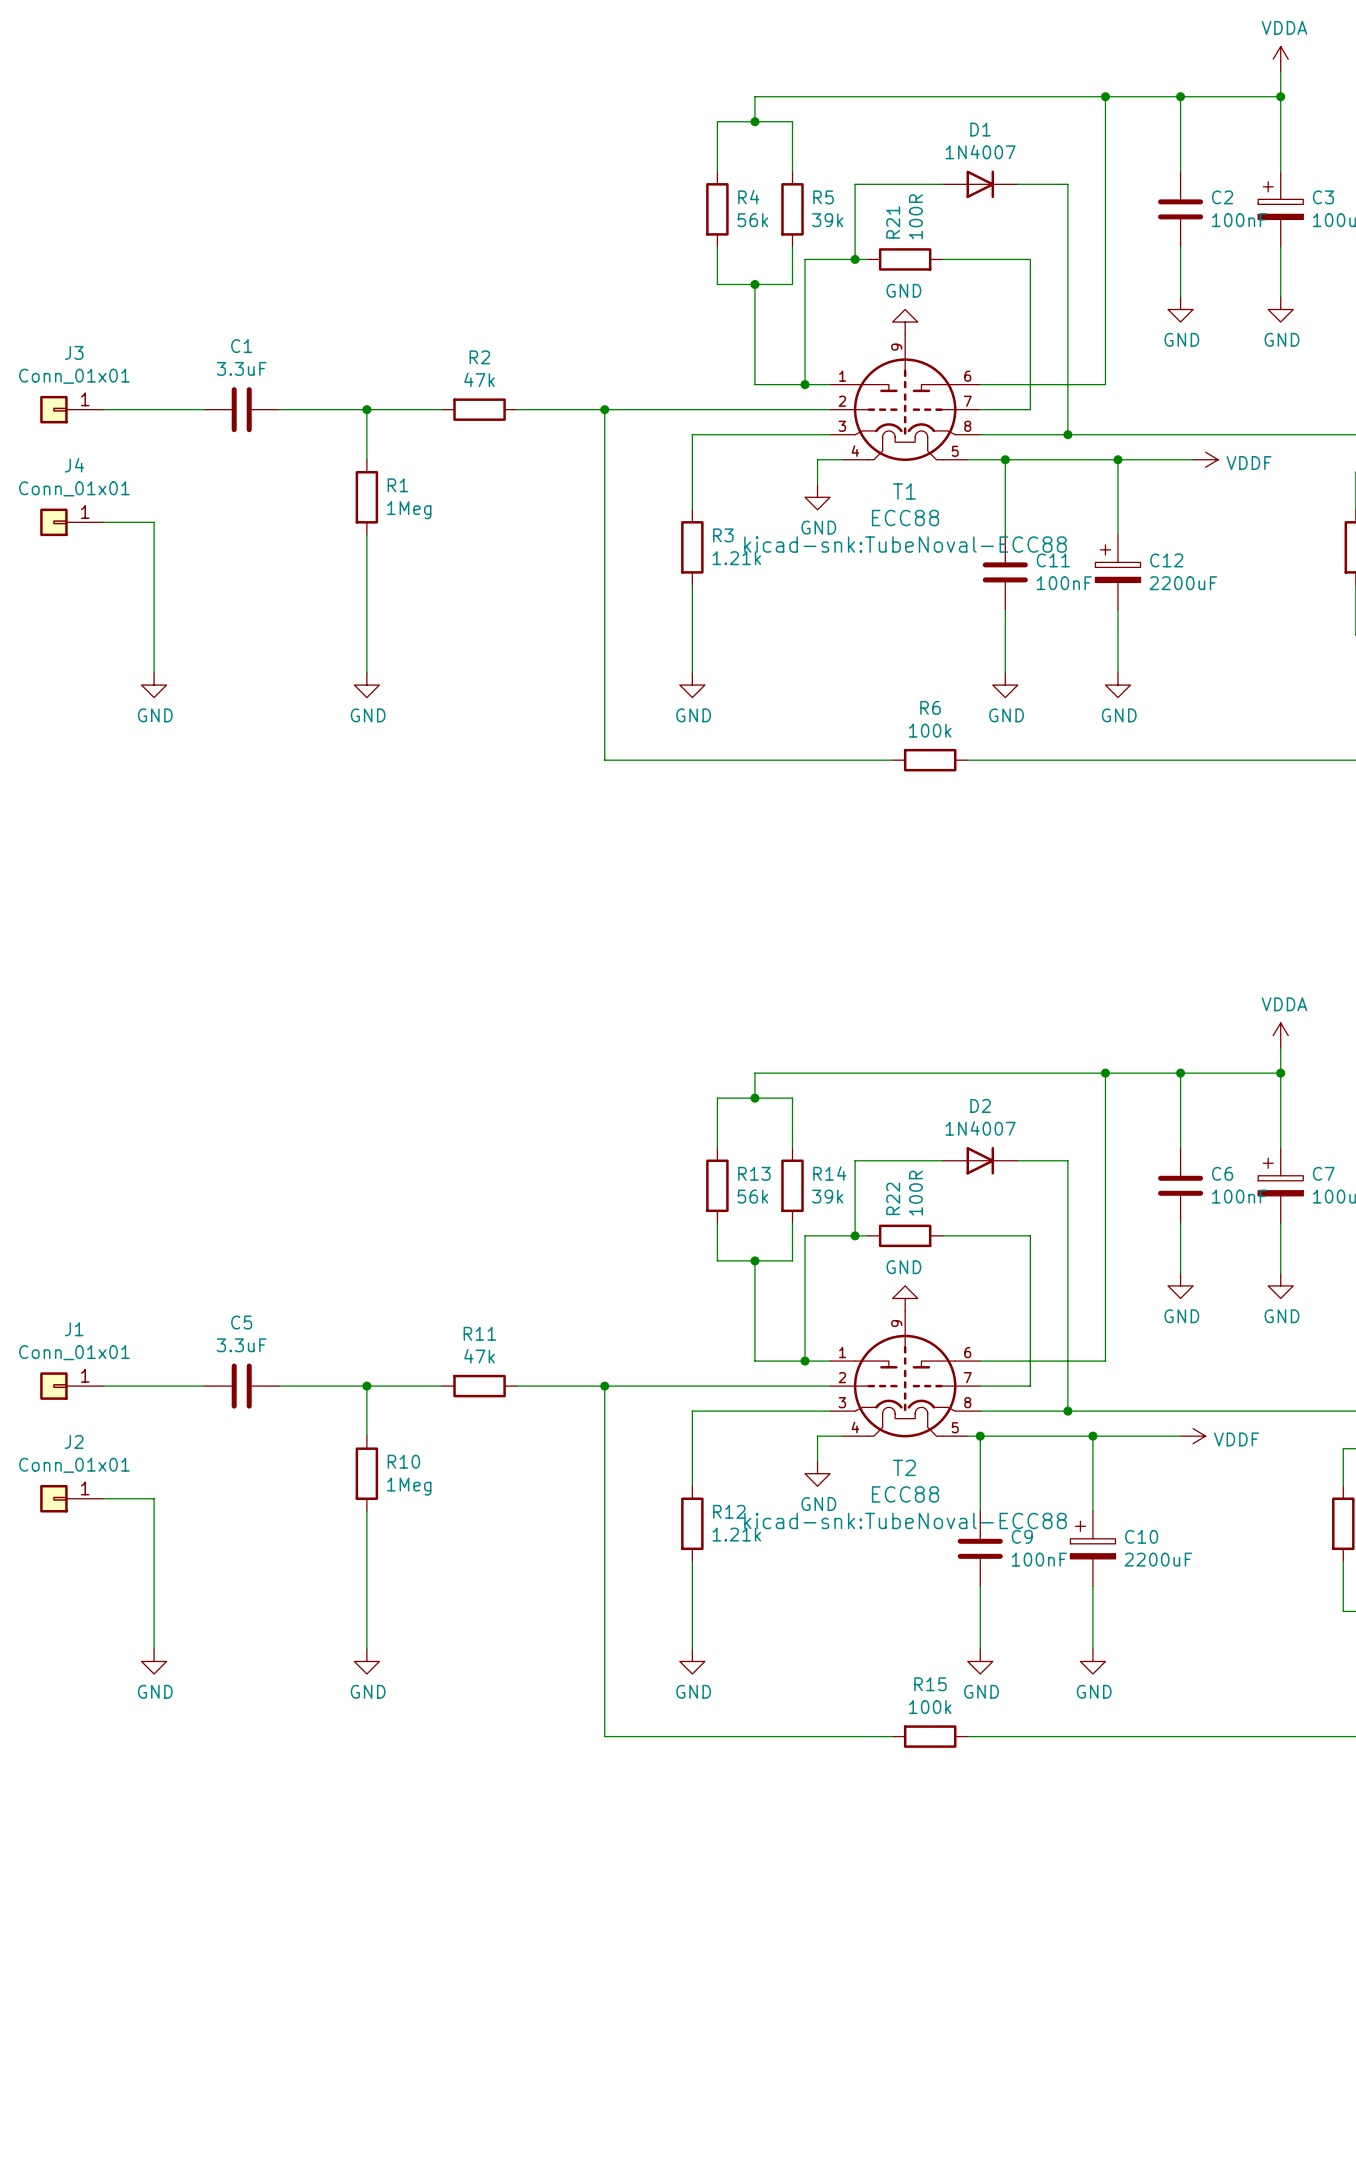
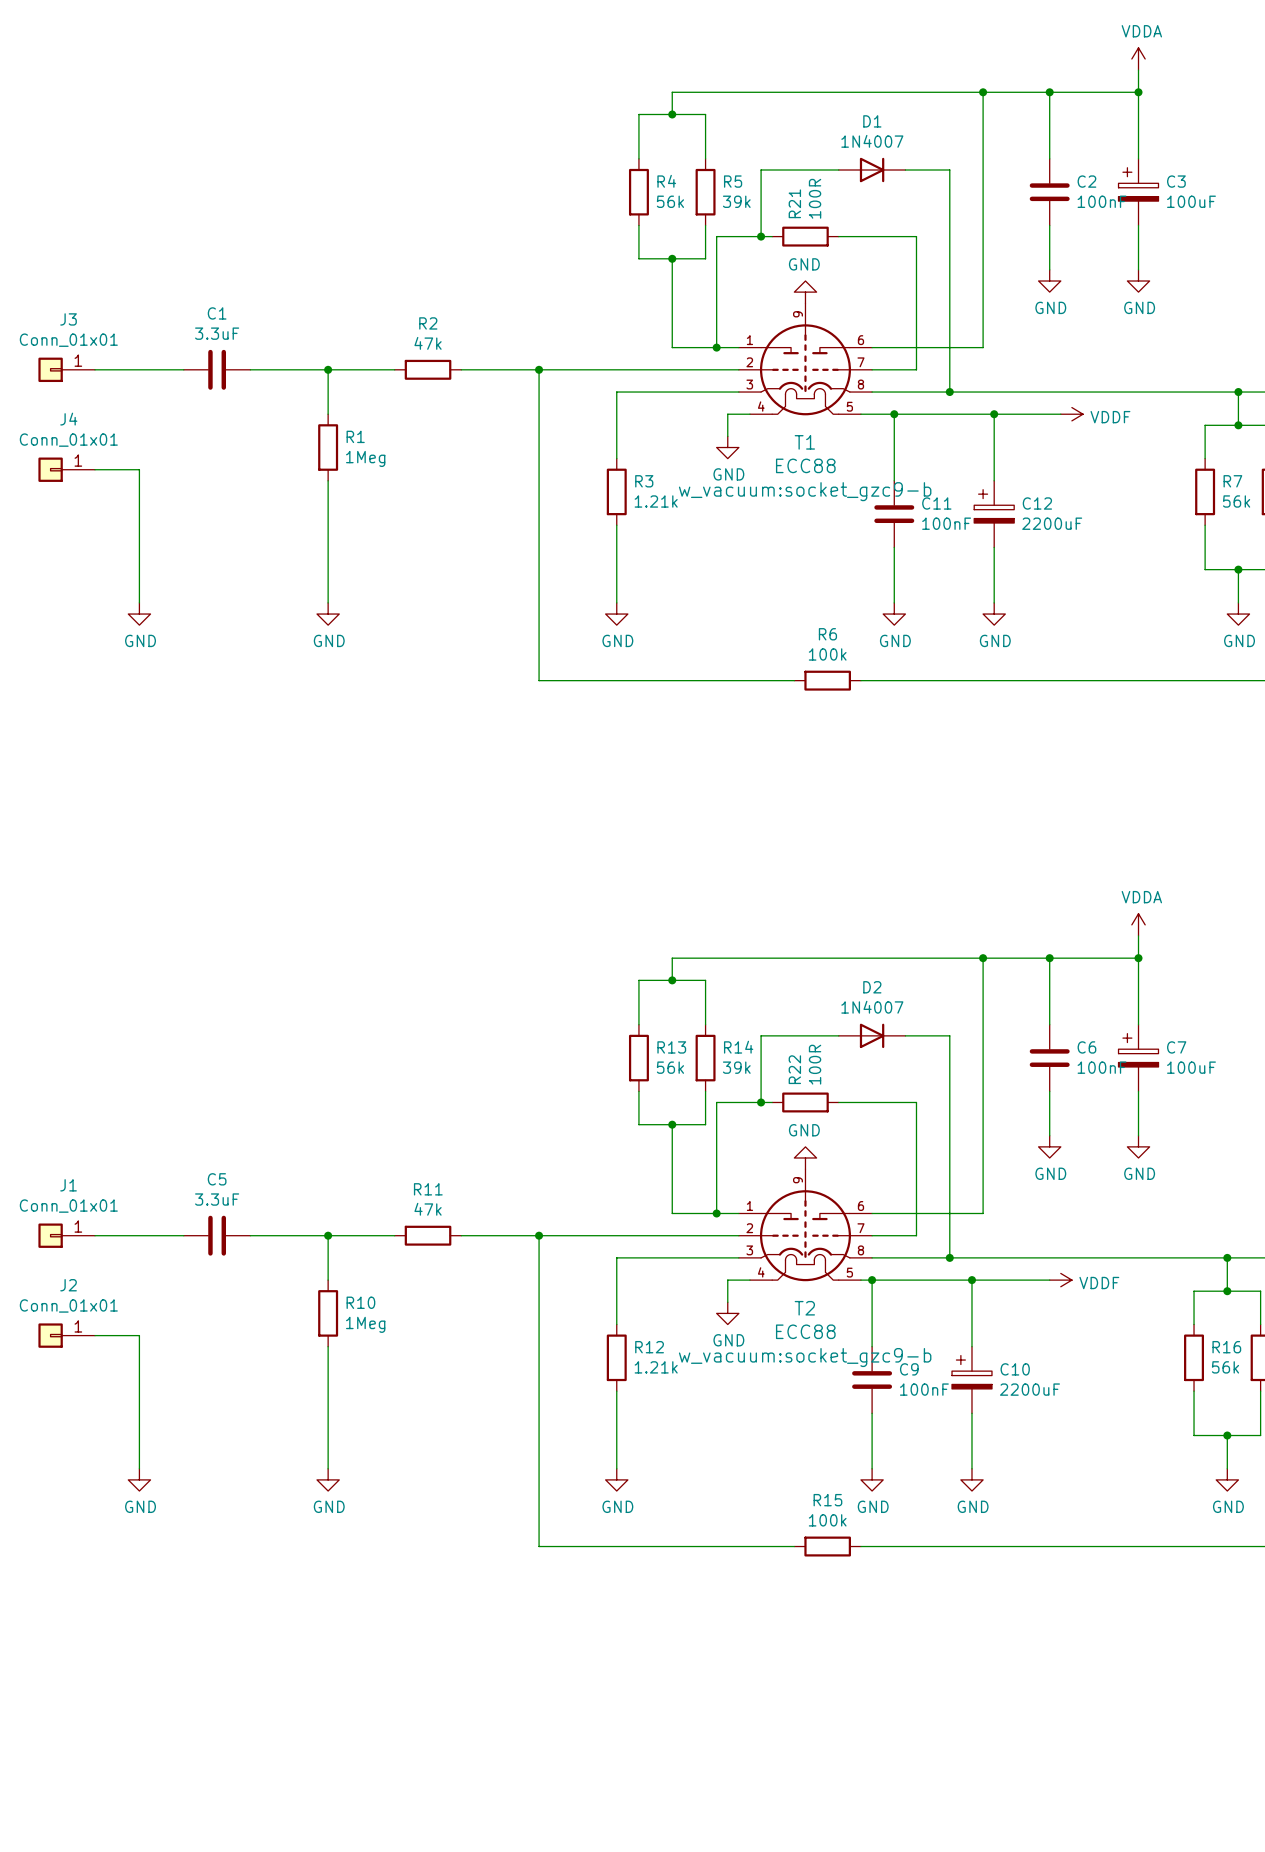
T1 text: kicad-snk:TubeNoval-ECC88 (905, 544) -> w_vacuum:socket_gzc9-b (805, 491)
T2 text: kicad-snk:TubeNoval-ECC88 (905, 1520) -> w_vacuum:socket_gzc9-b (805, 1357)

